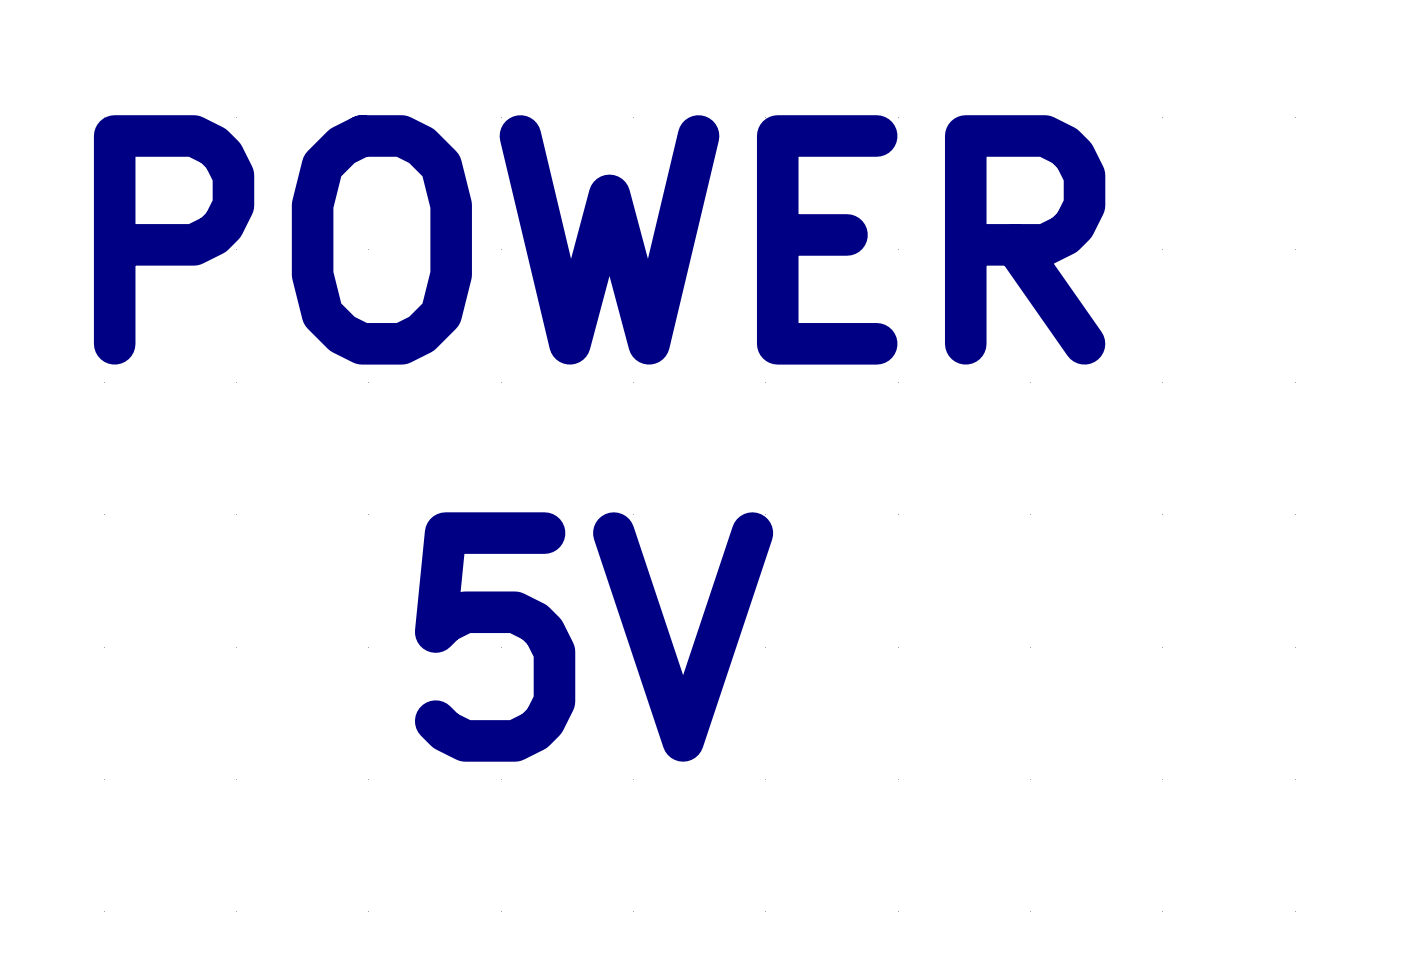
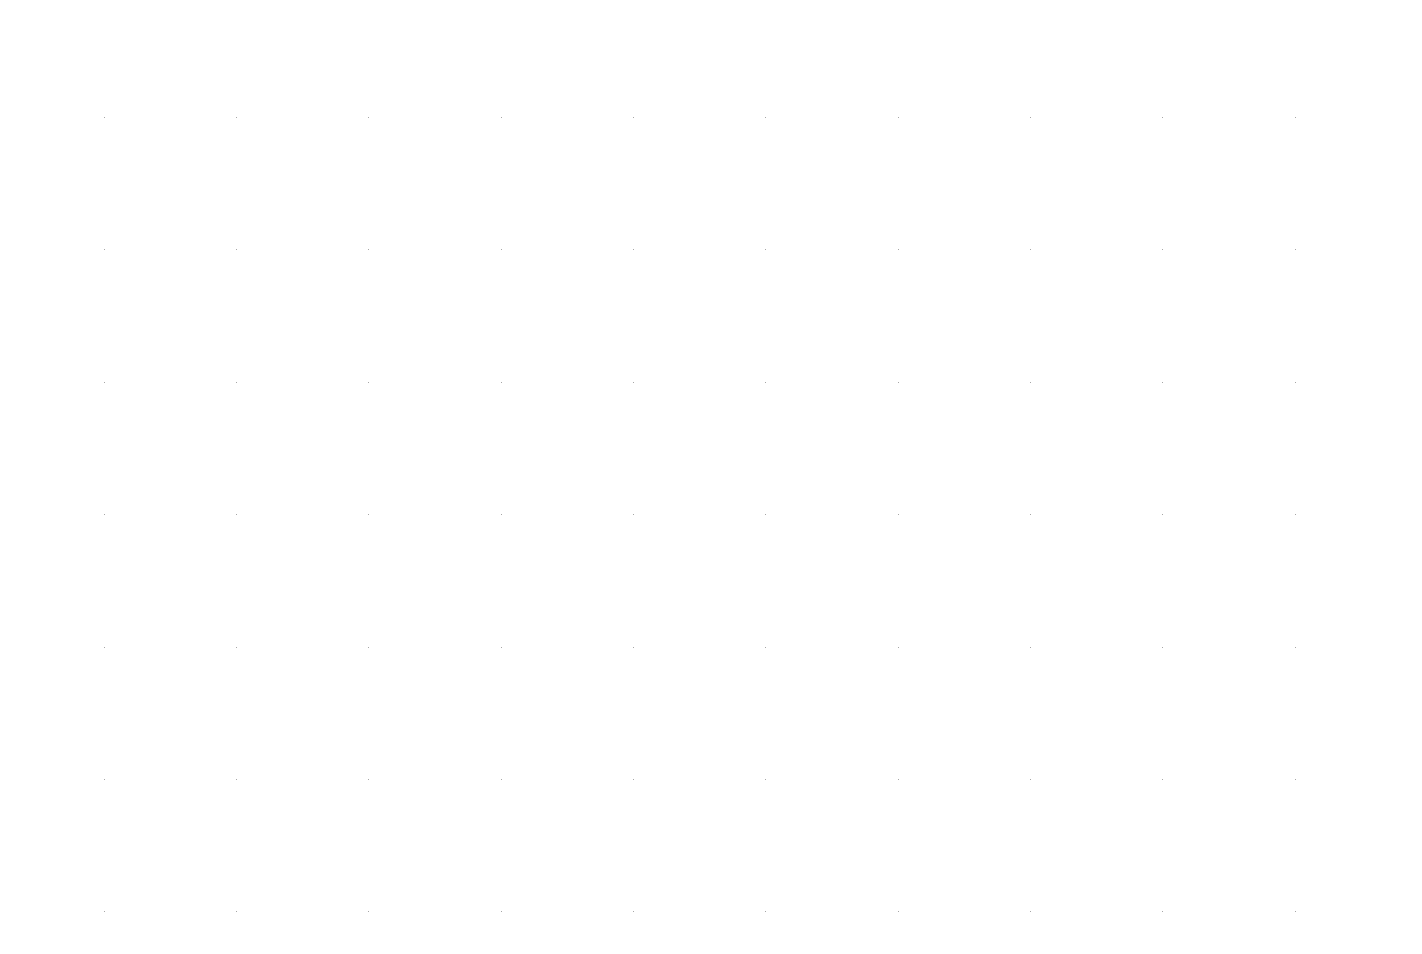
text: POWER (599, 239) -> none
text: 5V (594, 637) -> none

